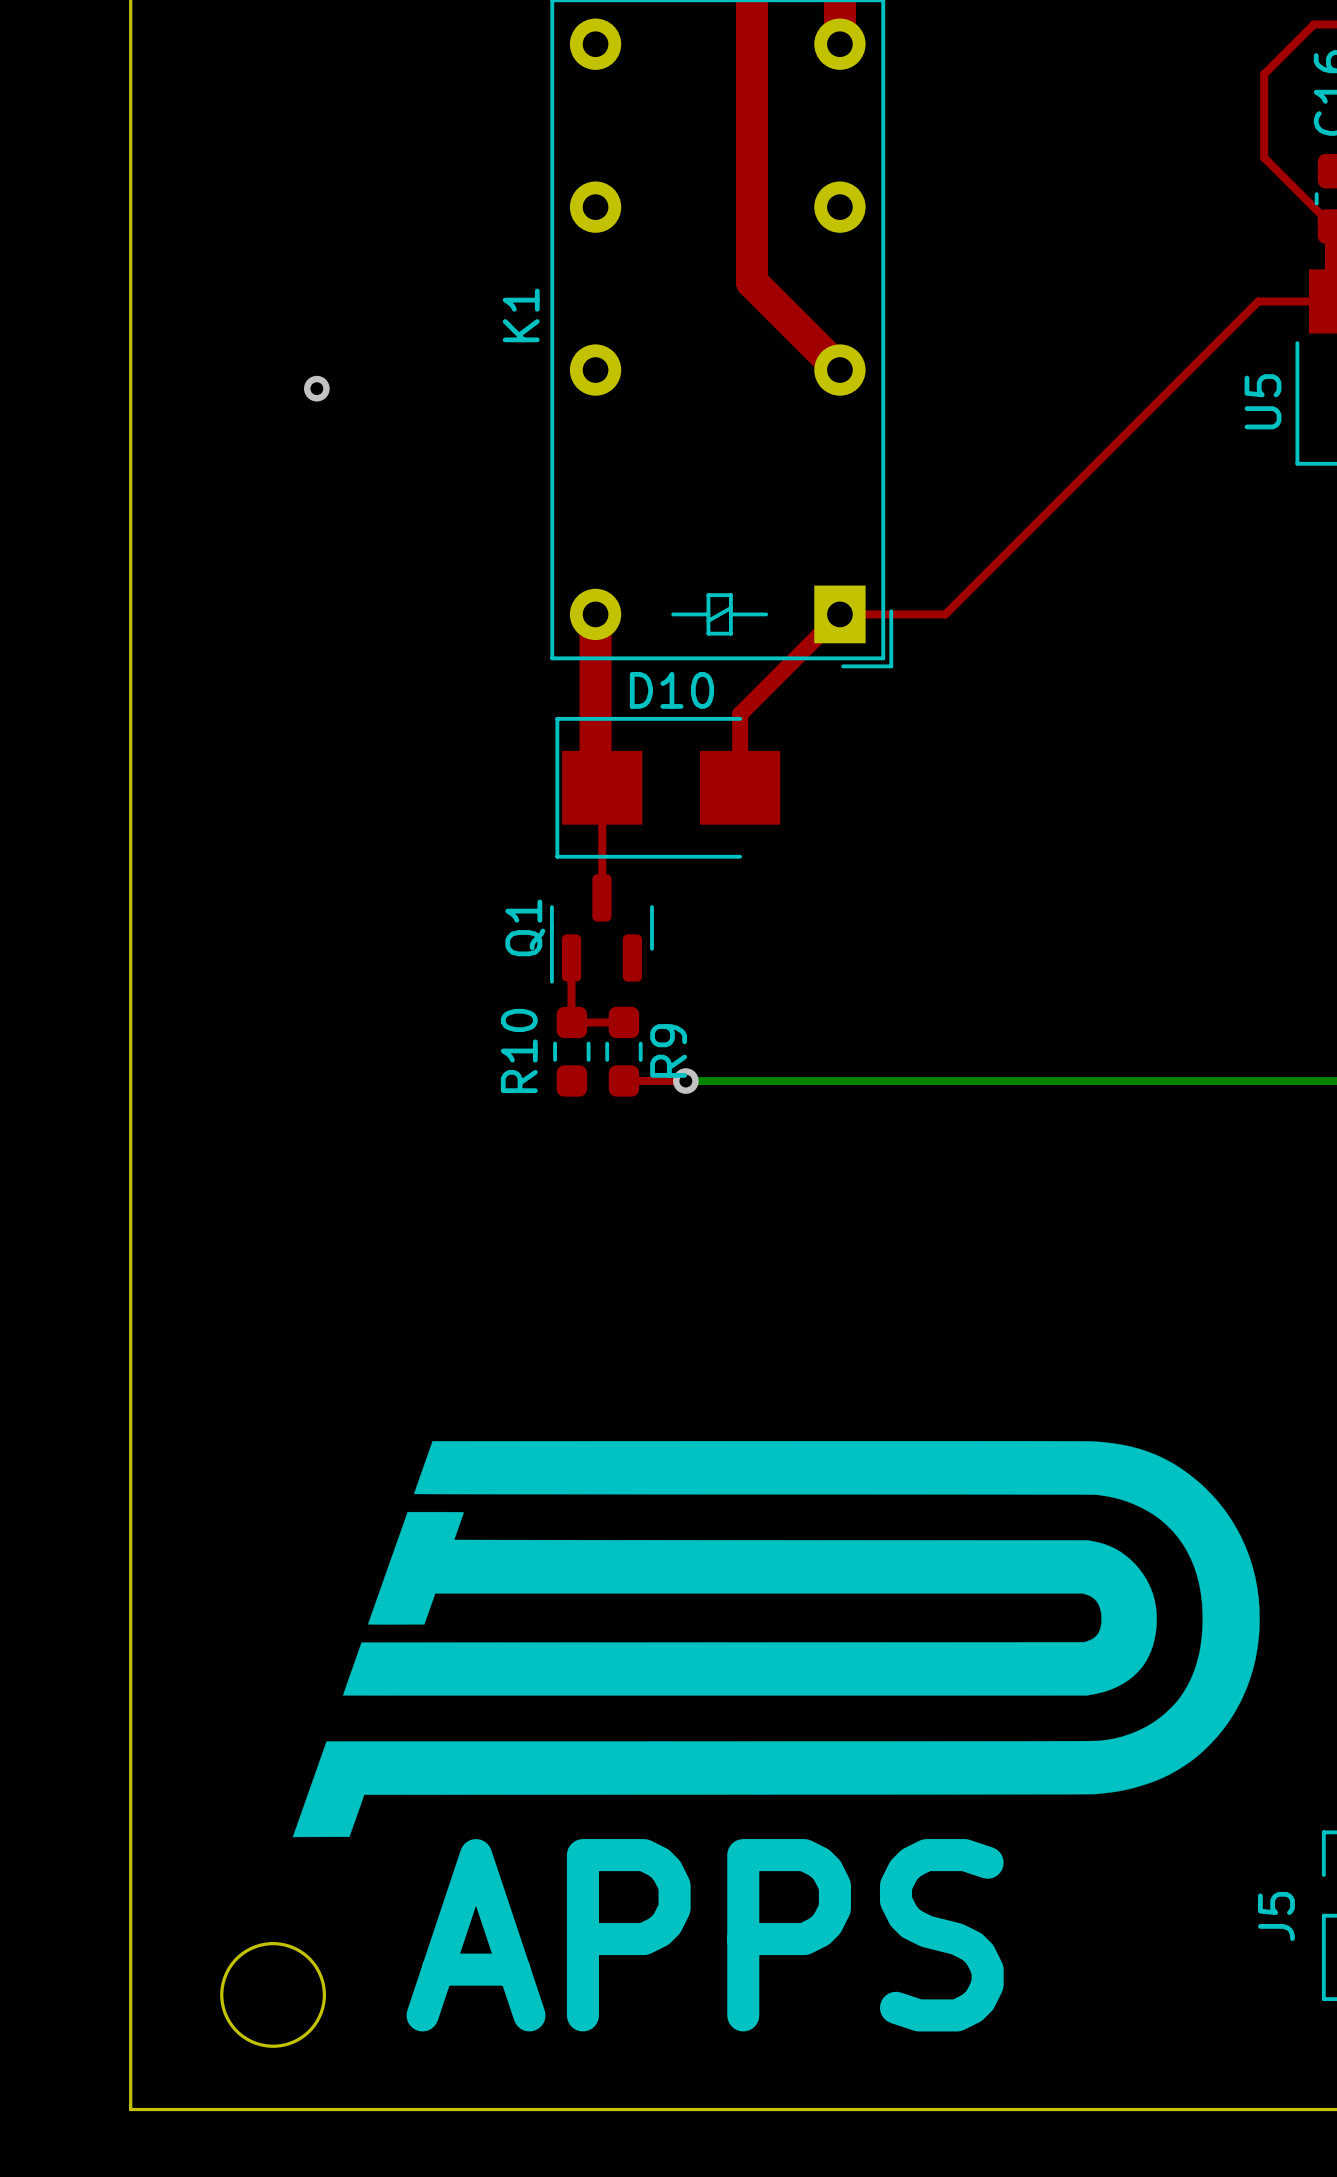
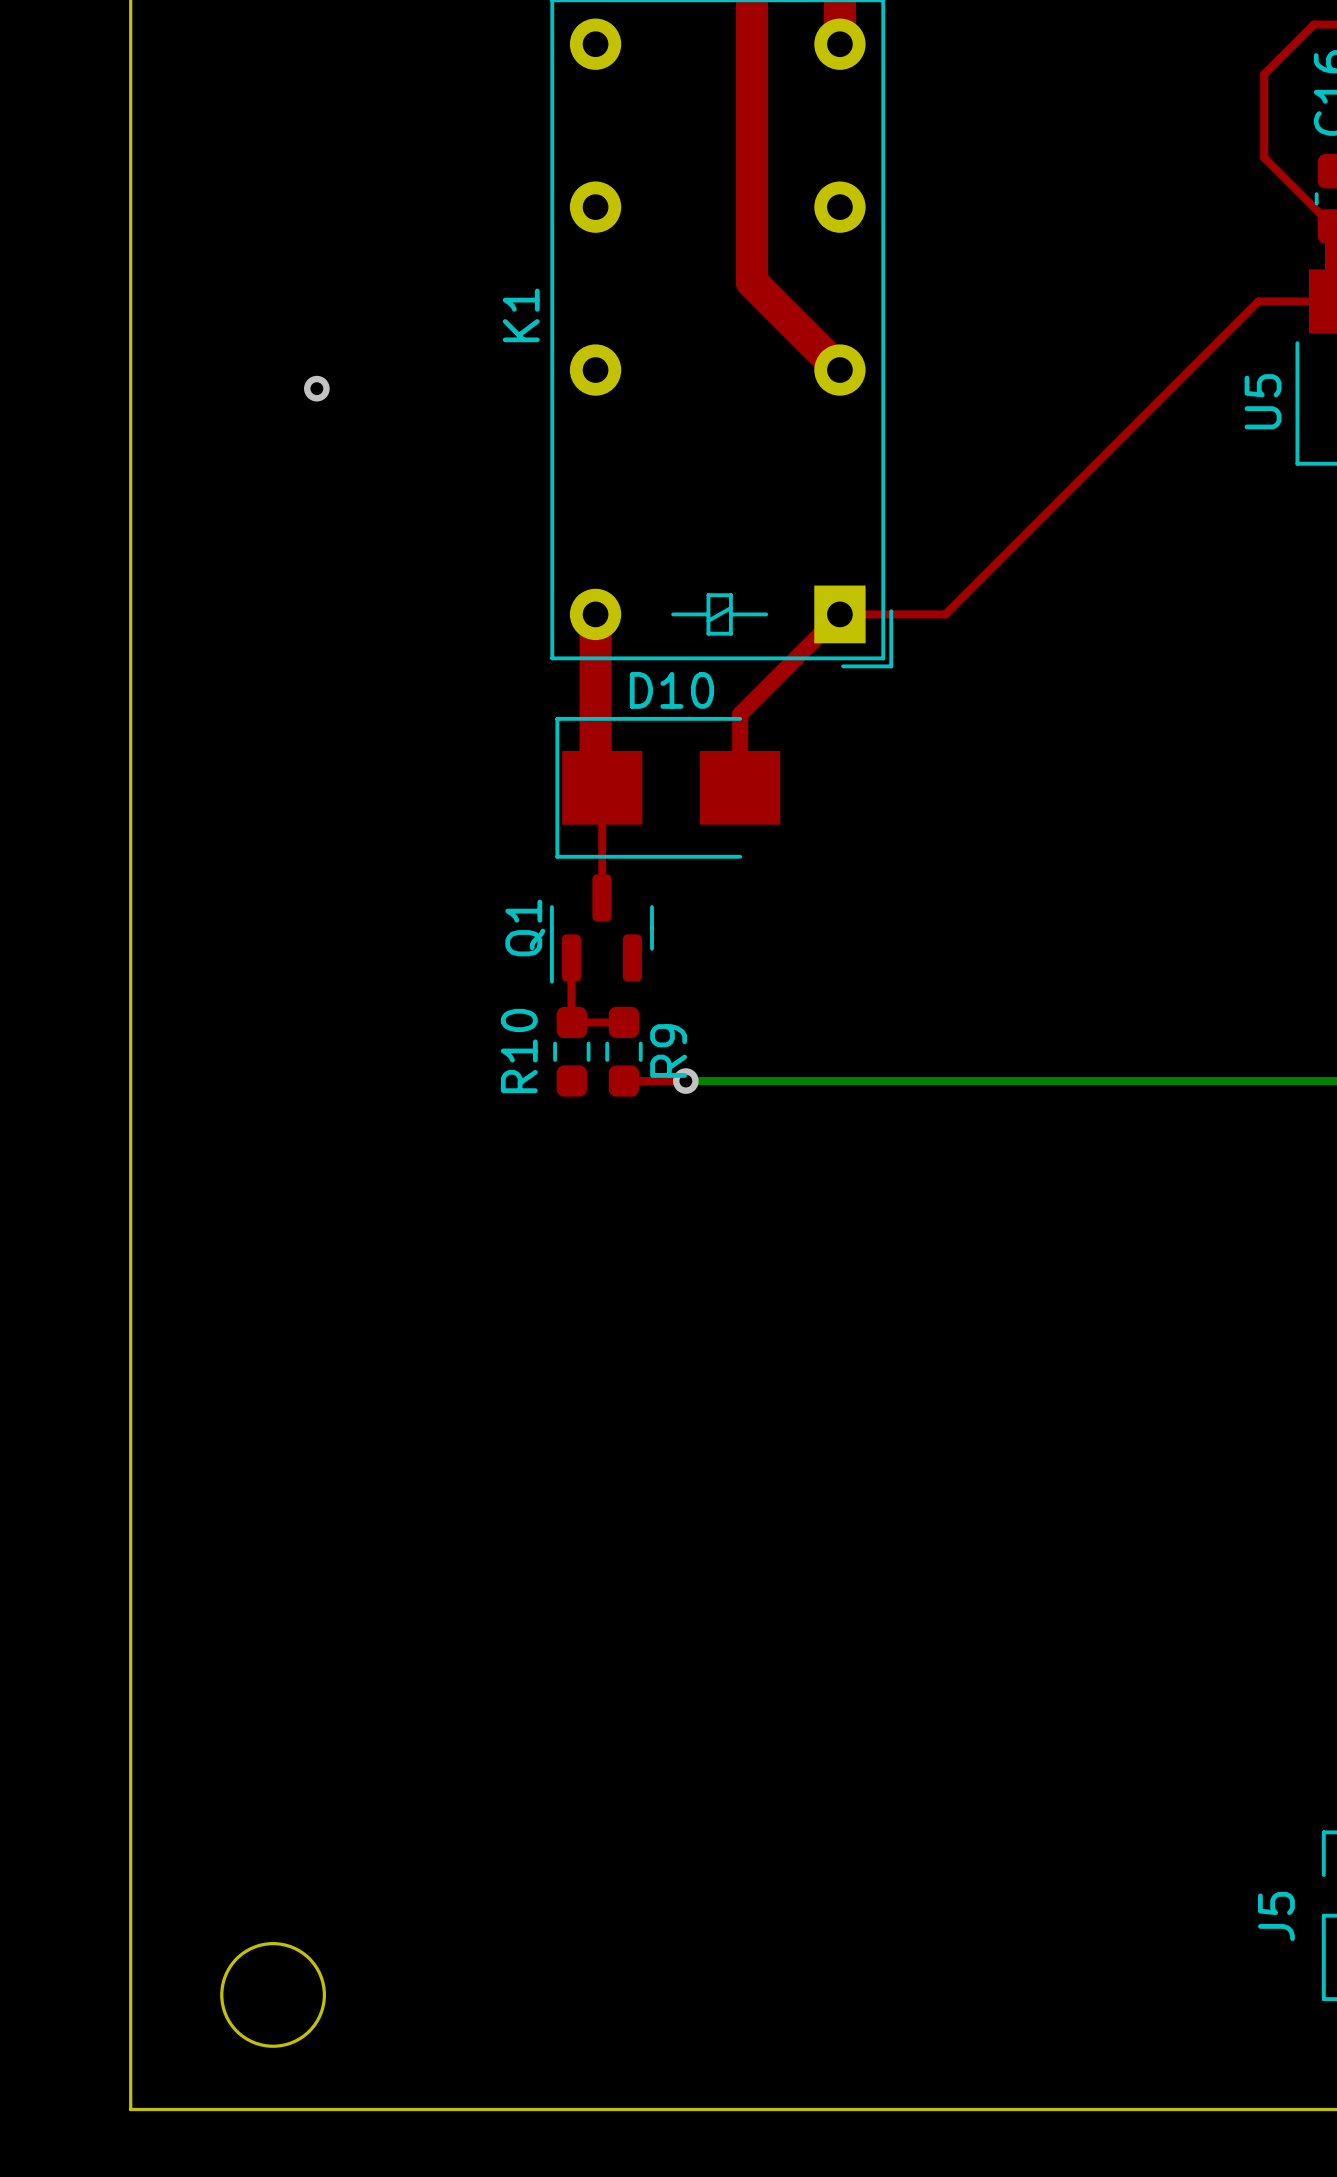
drawing: [292, 1440, 1260, 1838] -> none
text: APPS (705, 1935) -> none

